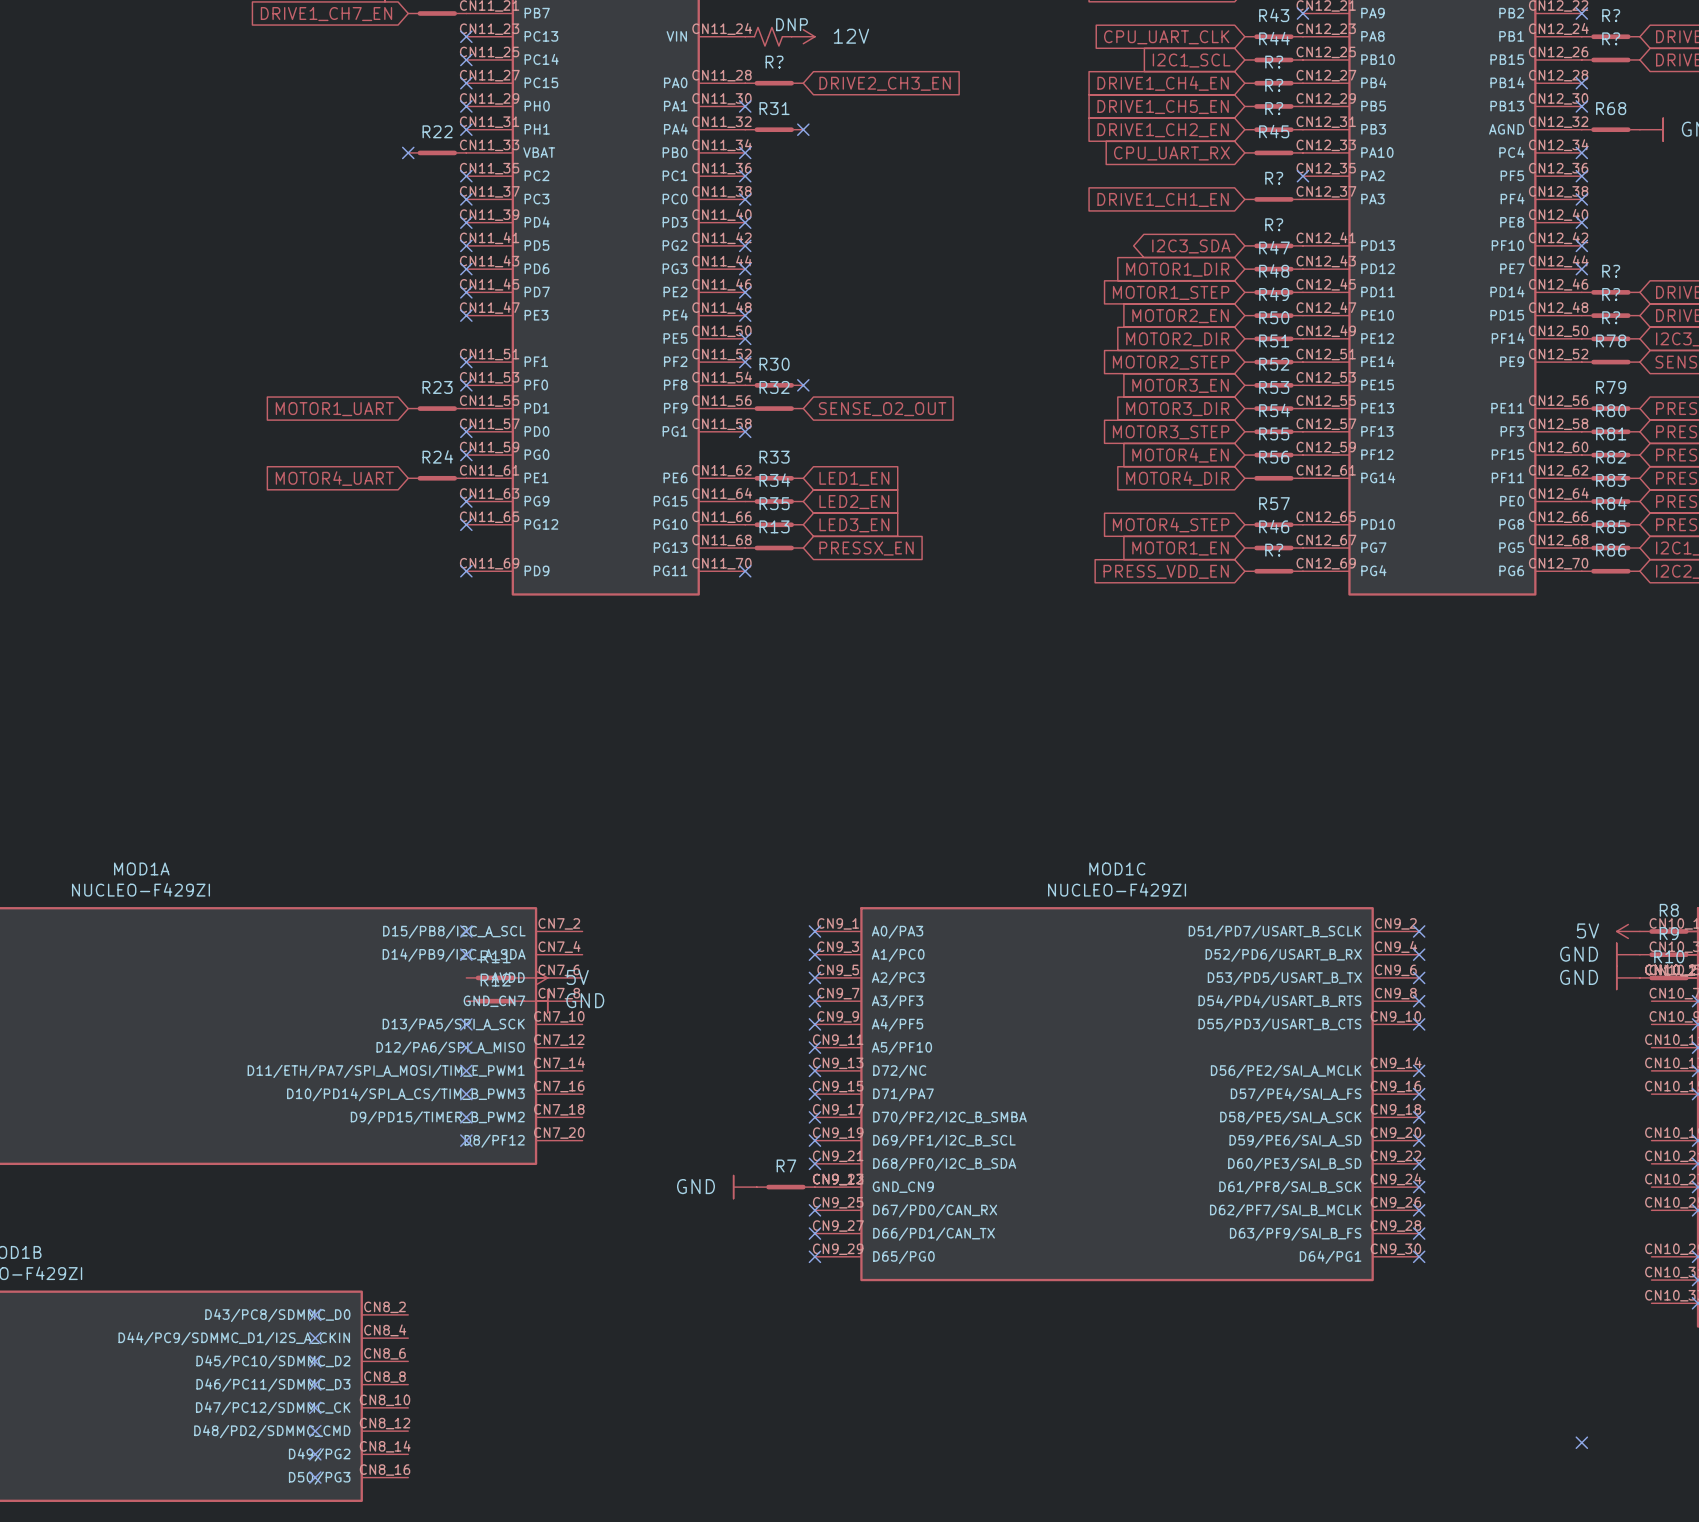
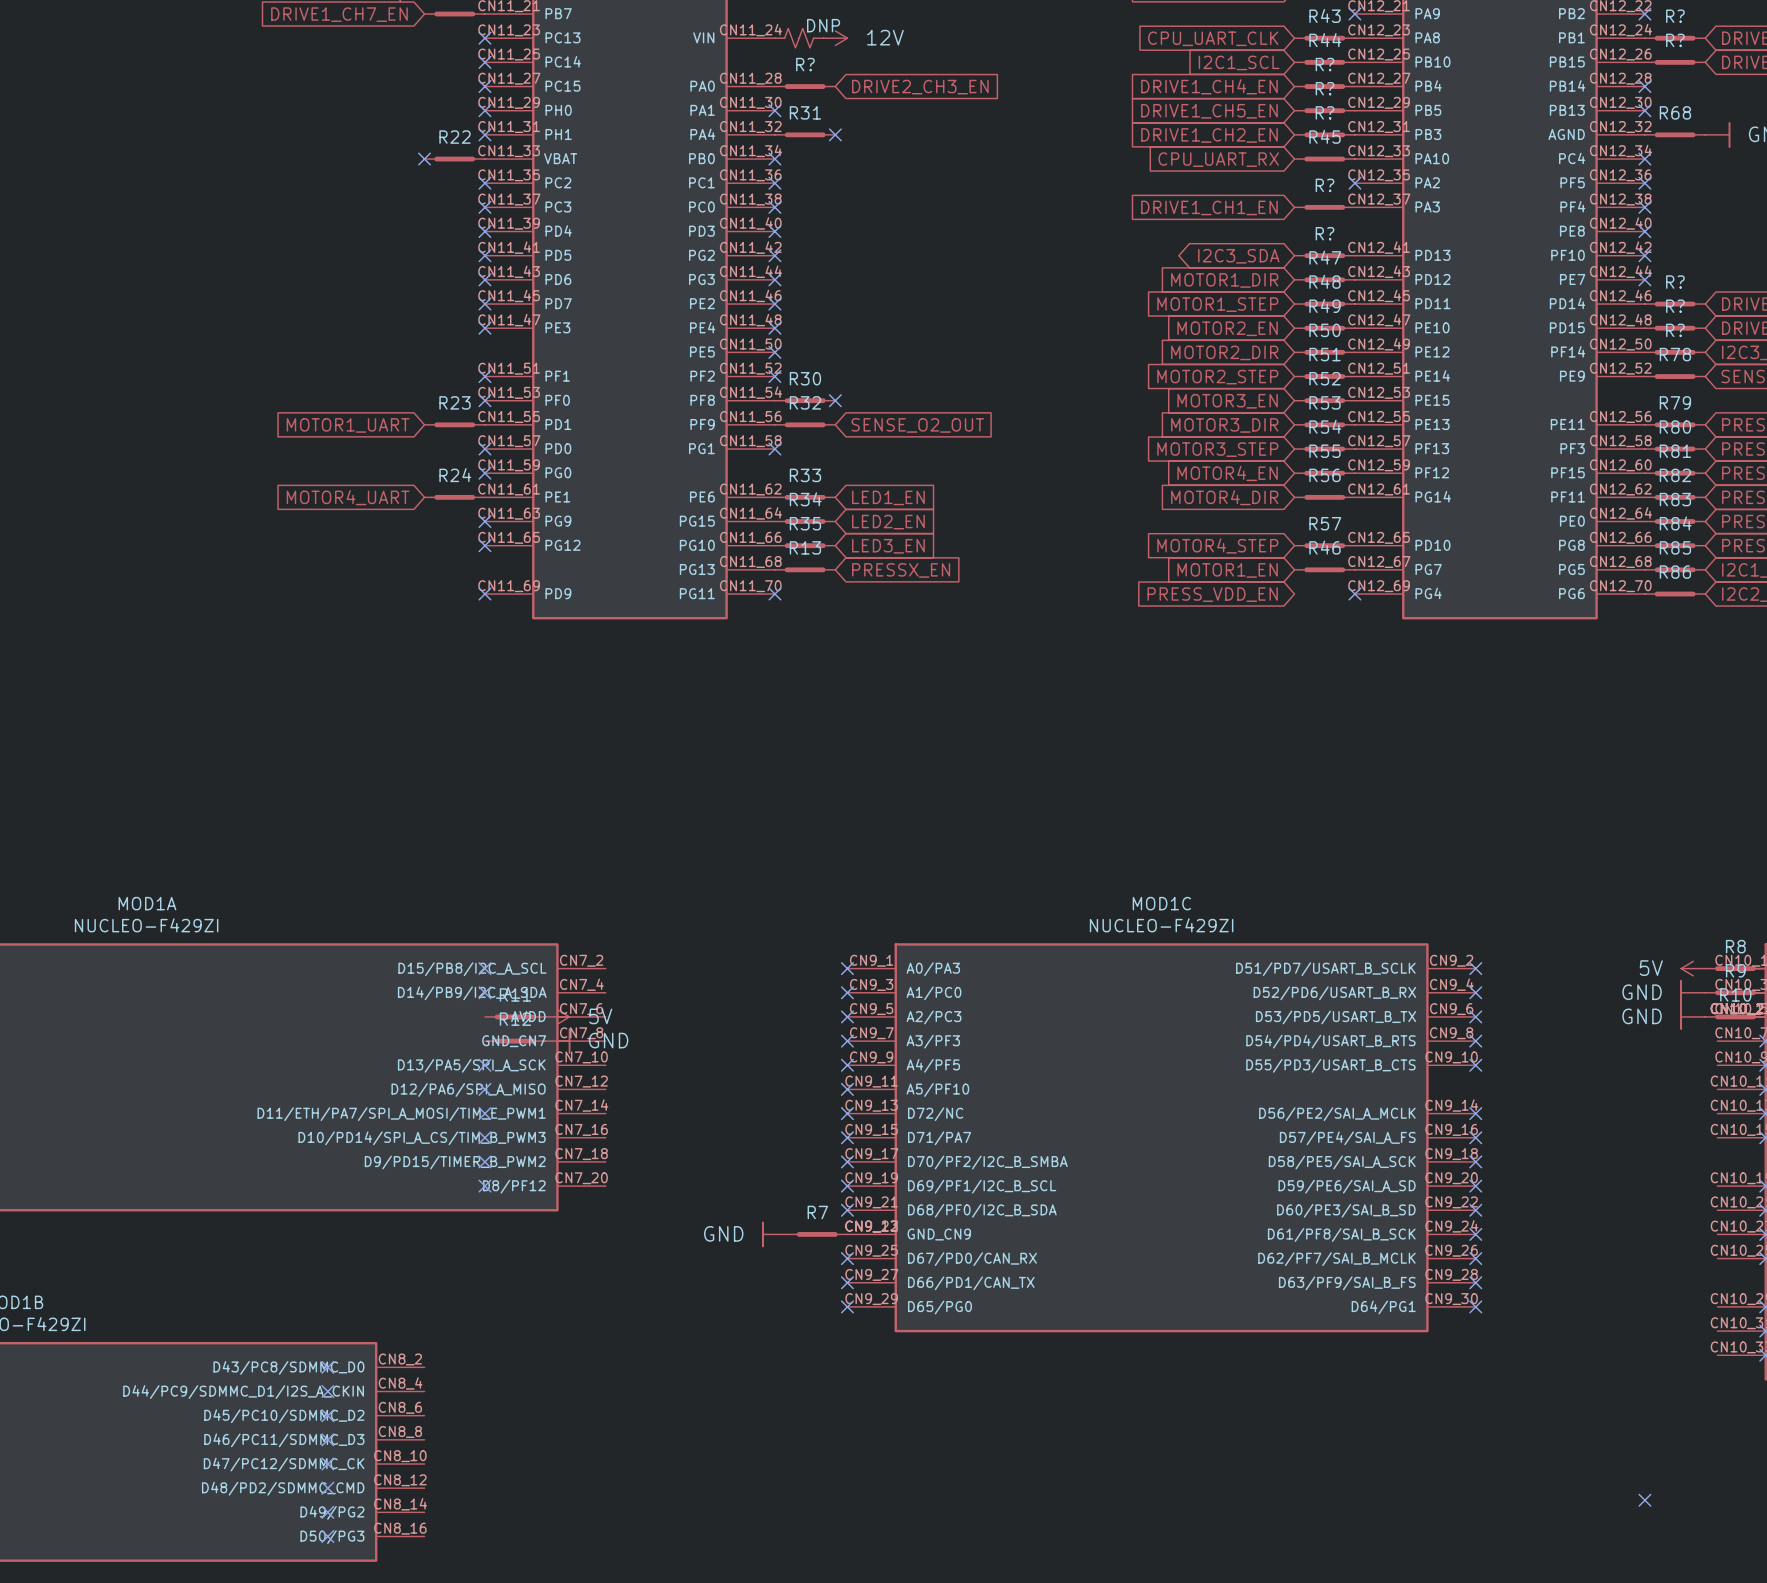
R?: (1273, 571) -> none
no-connect mark: none -> (1354, 594)

